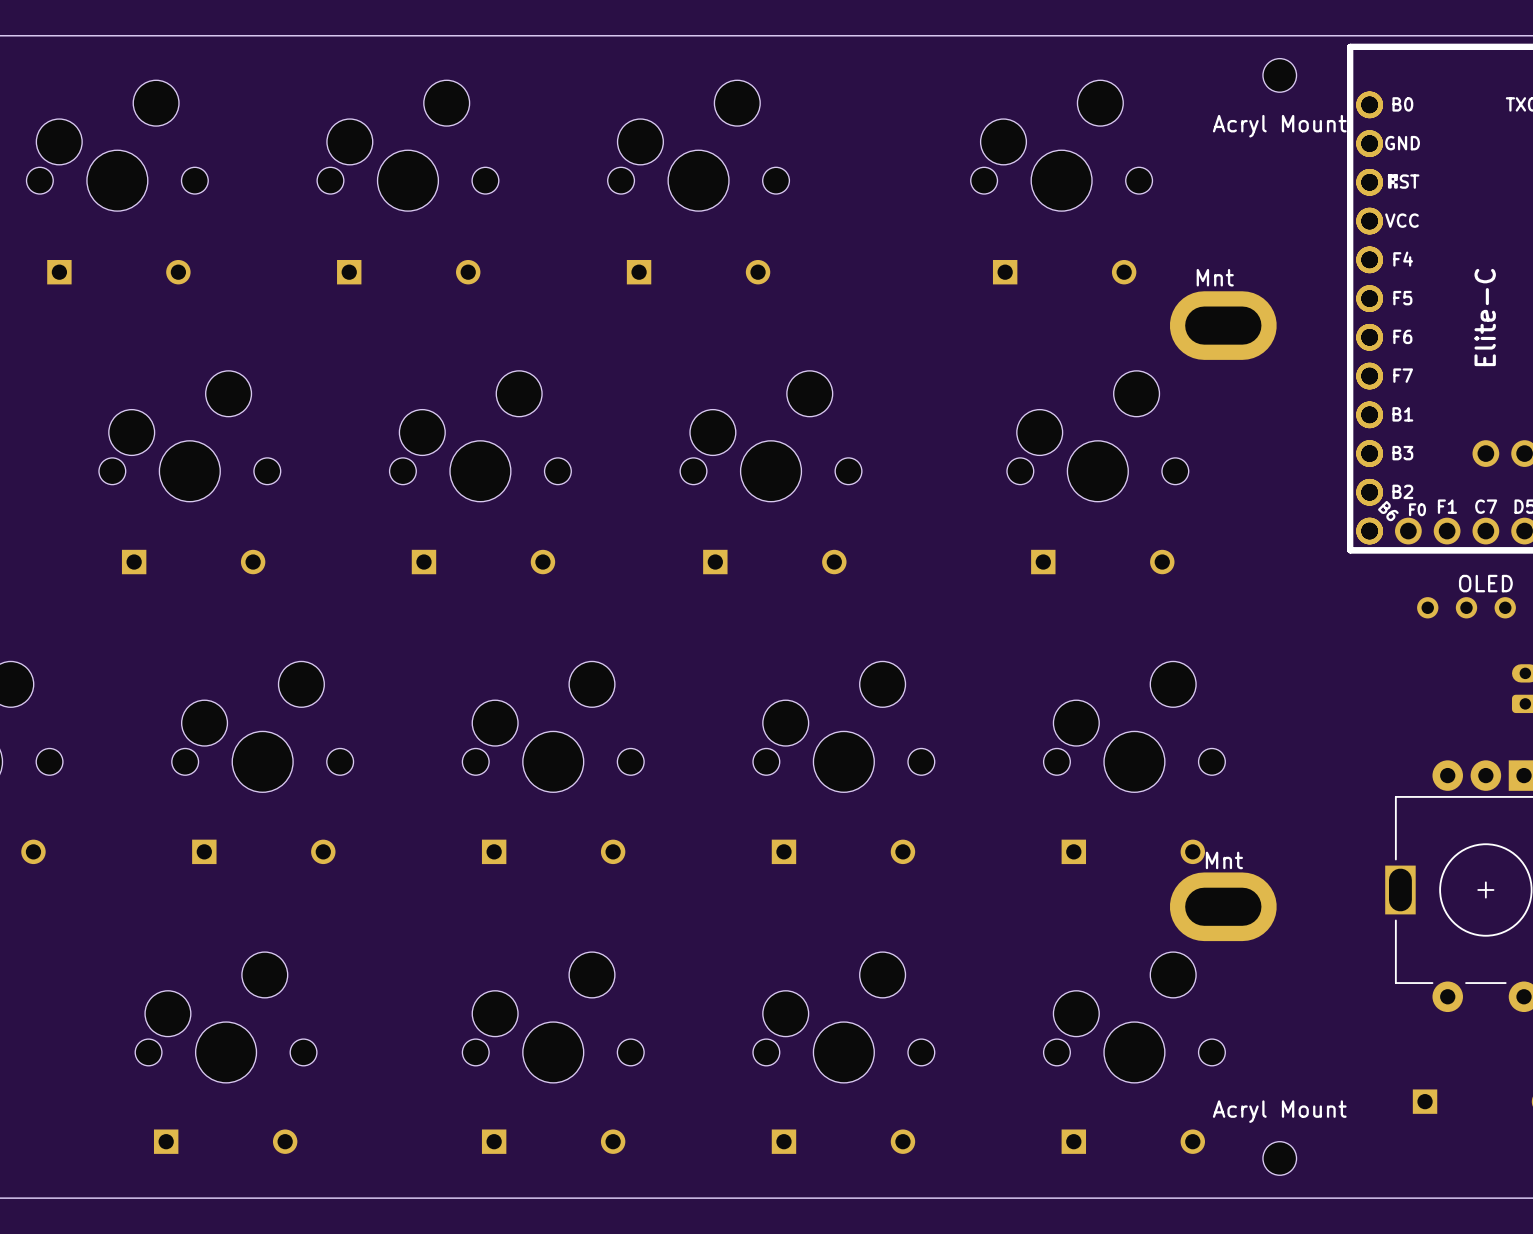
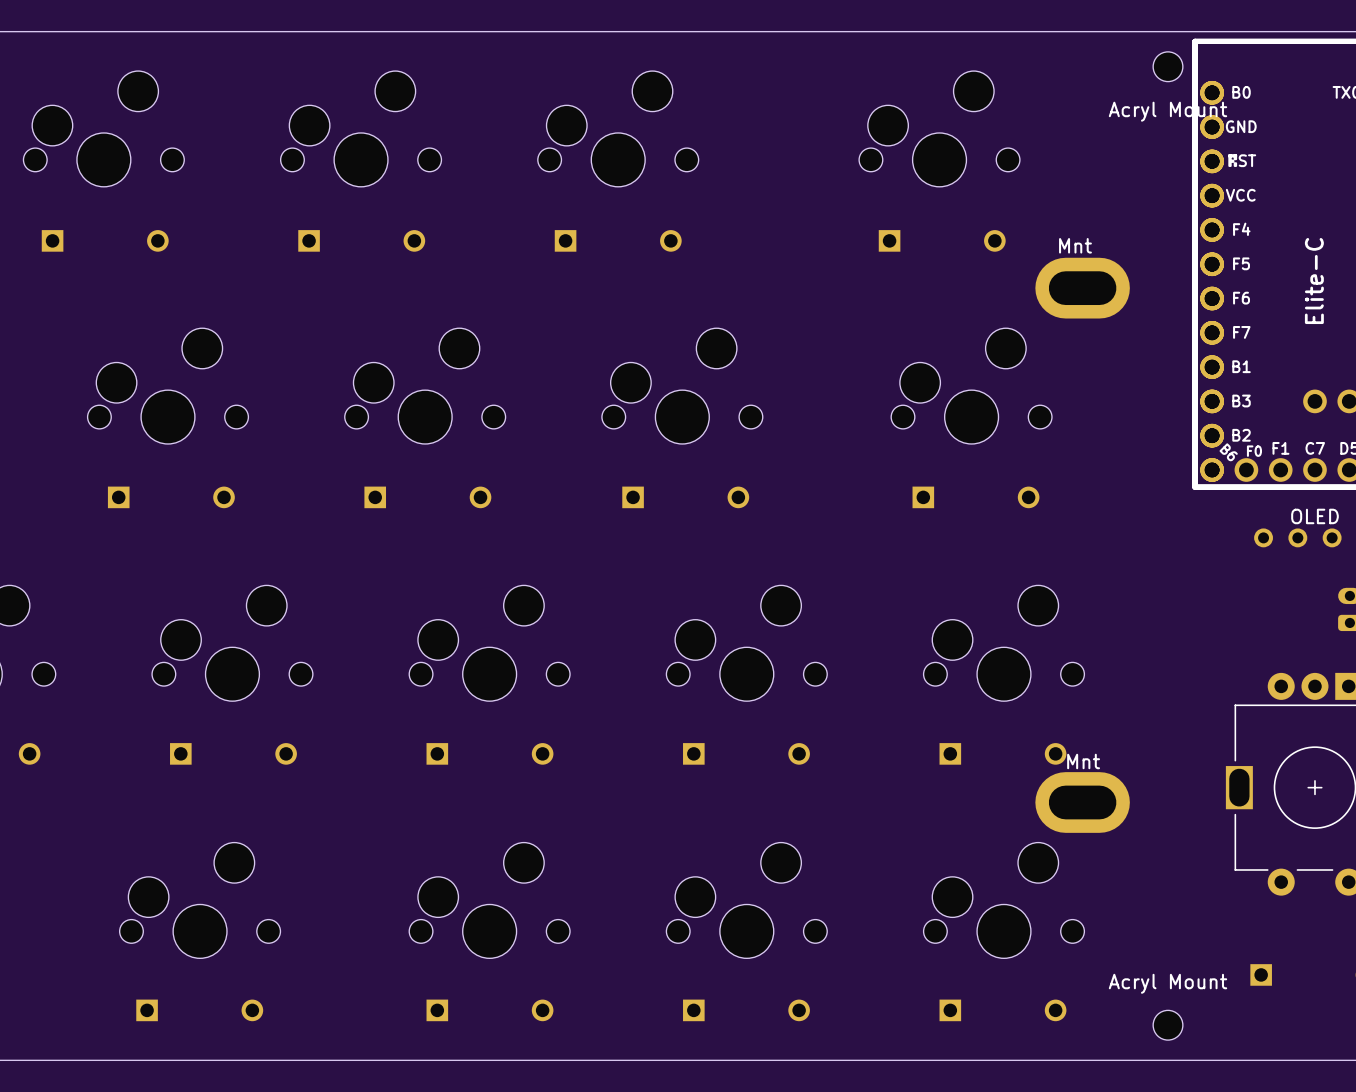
Acryl Mount position: (1279, 75) -> (1168, 66)
Acryl Mount position: (1279, 1158) -> (1168, 1025)

